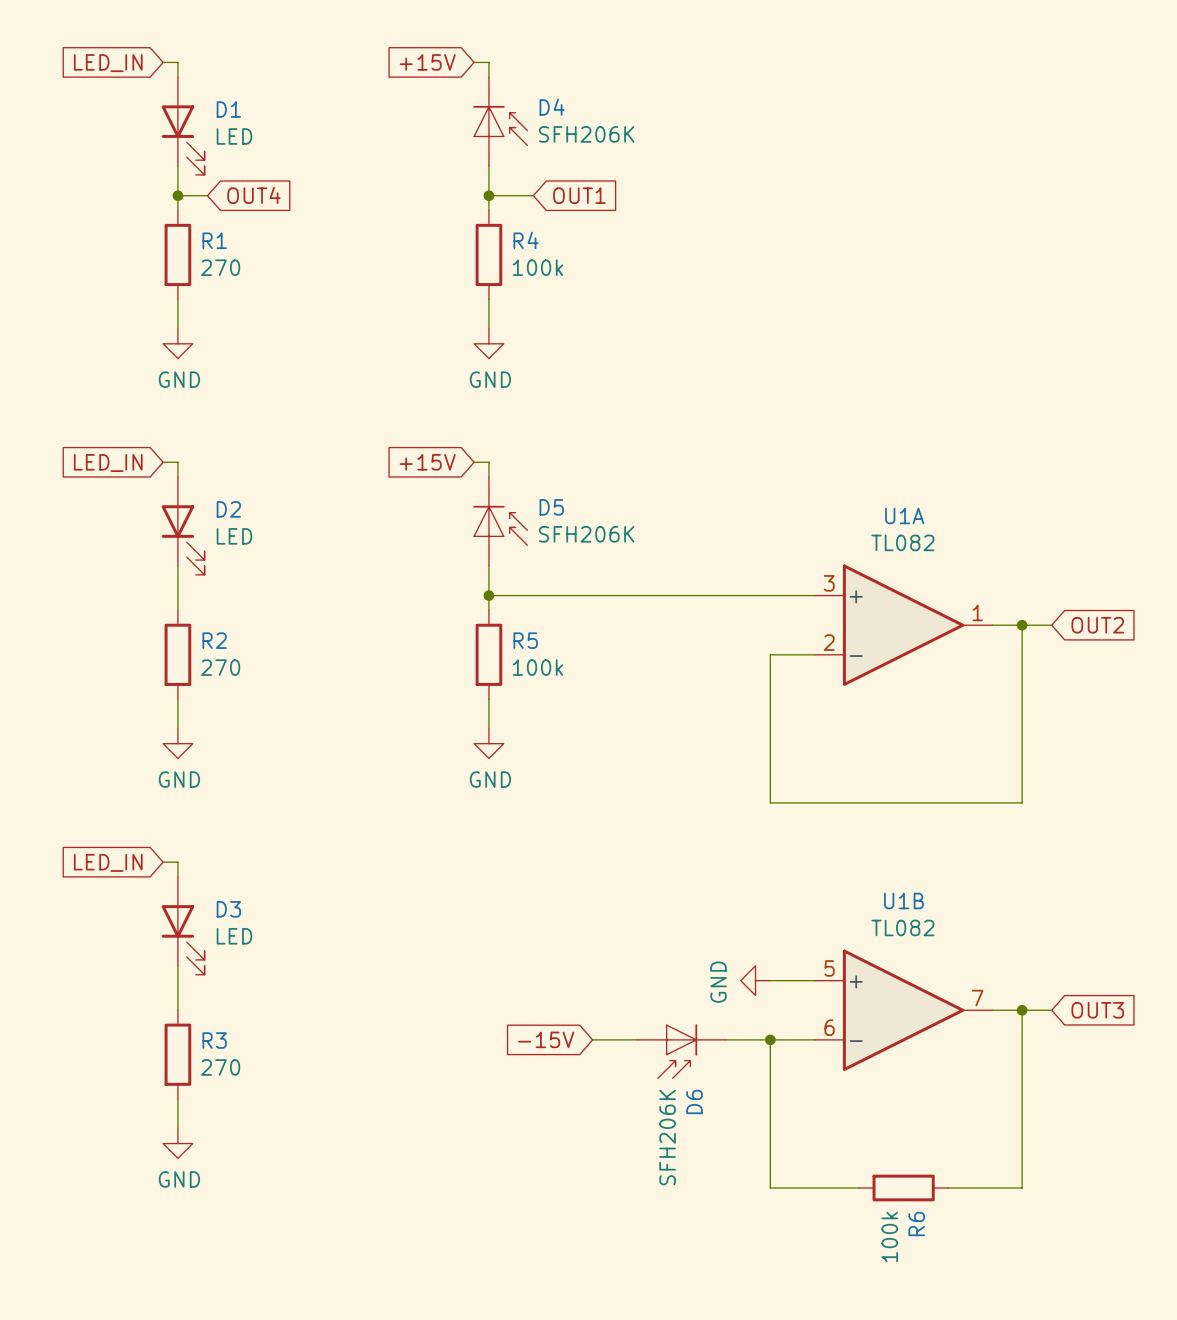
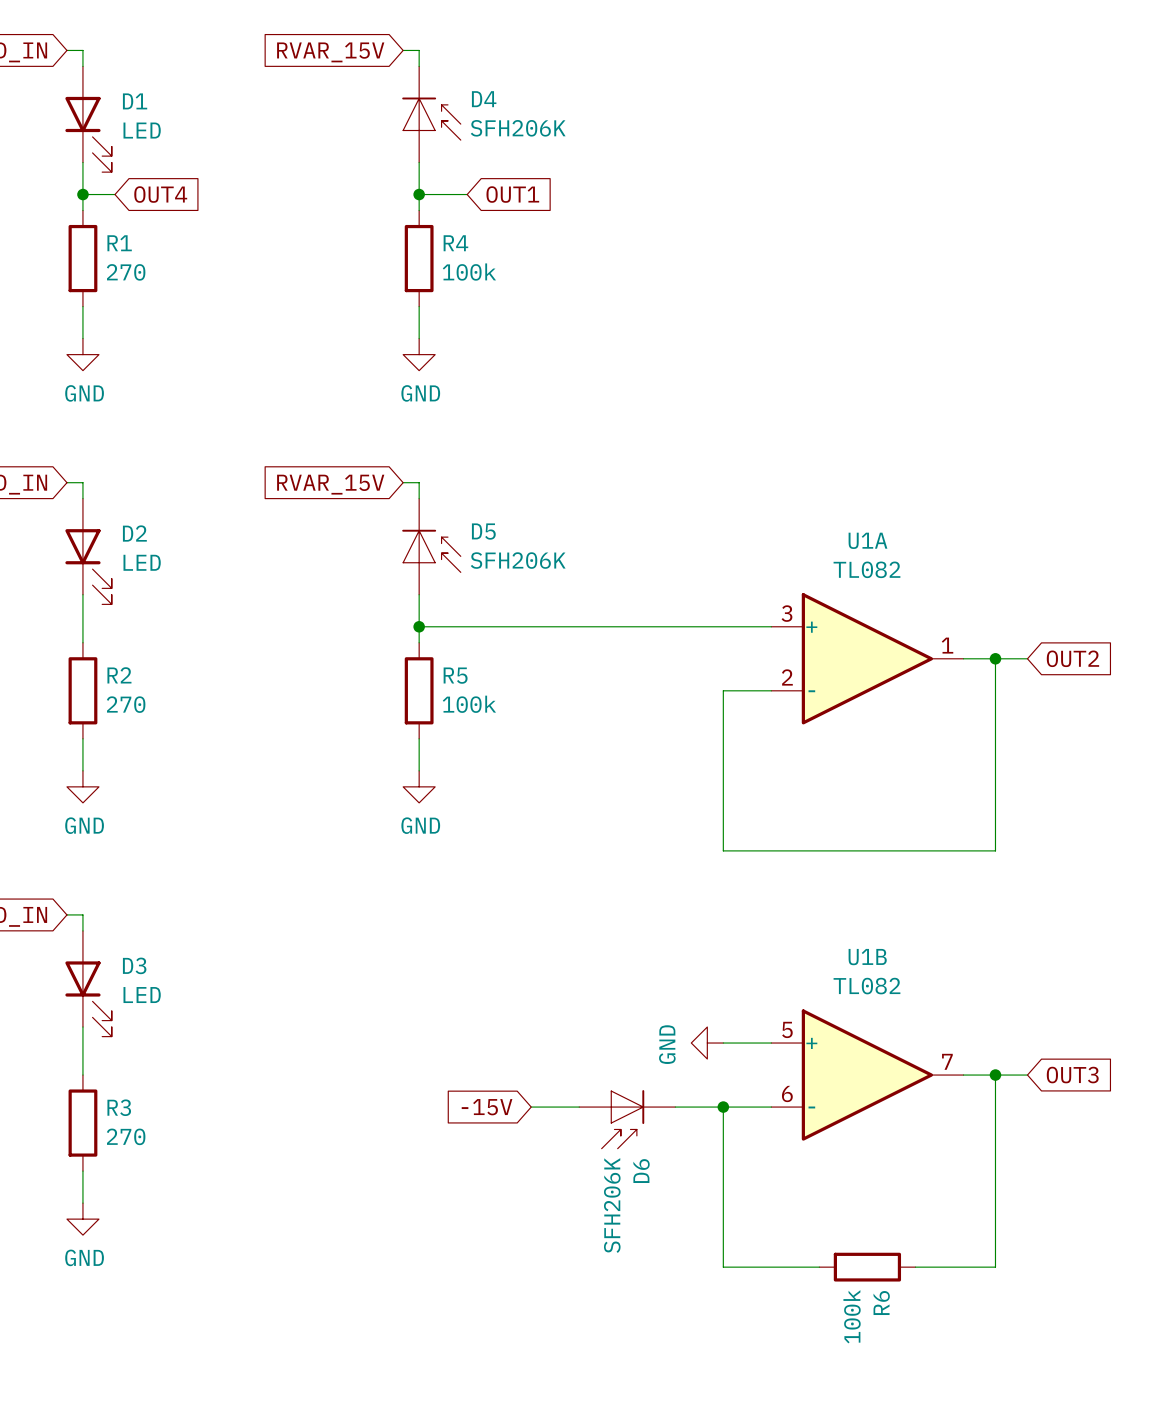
global label: +15V (427, 62) -> RVAR_15V (330, 52)
global label: +15V (427, 462) -> RVAR_15V (330, 484)

